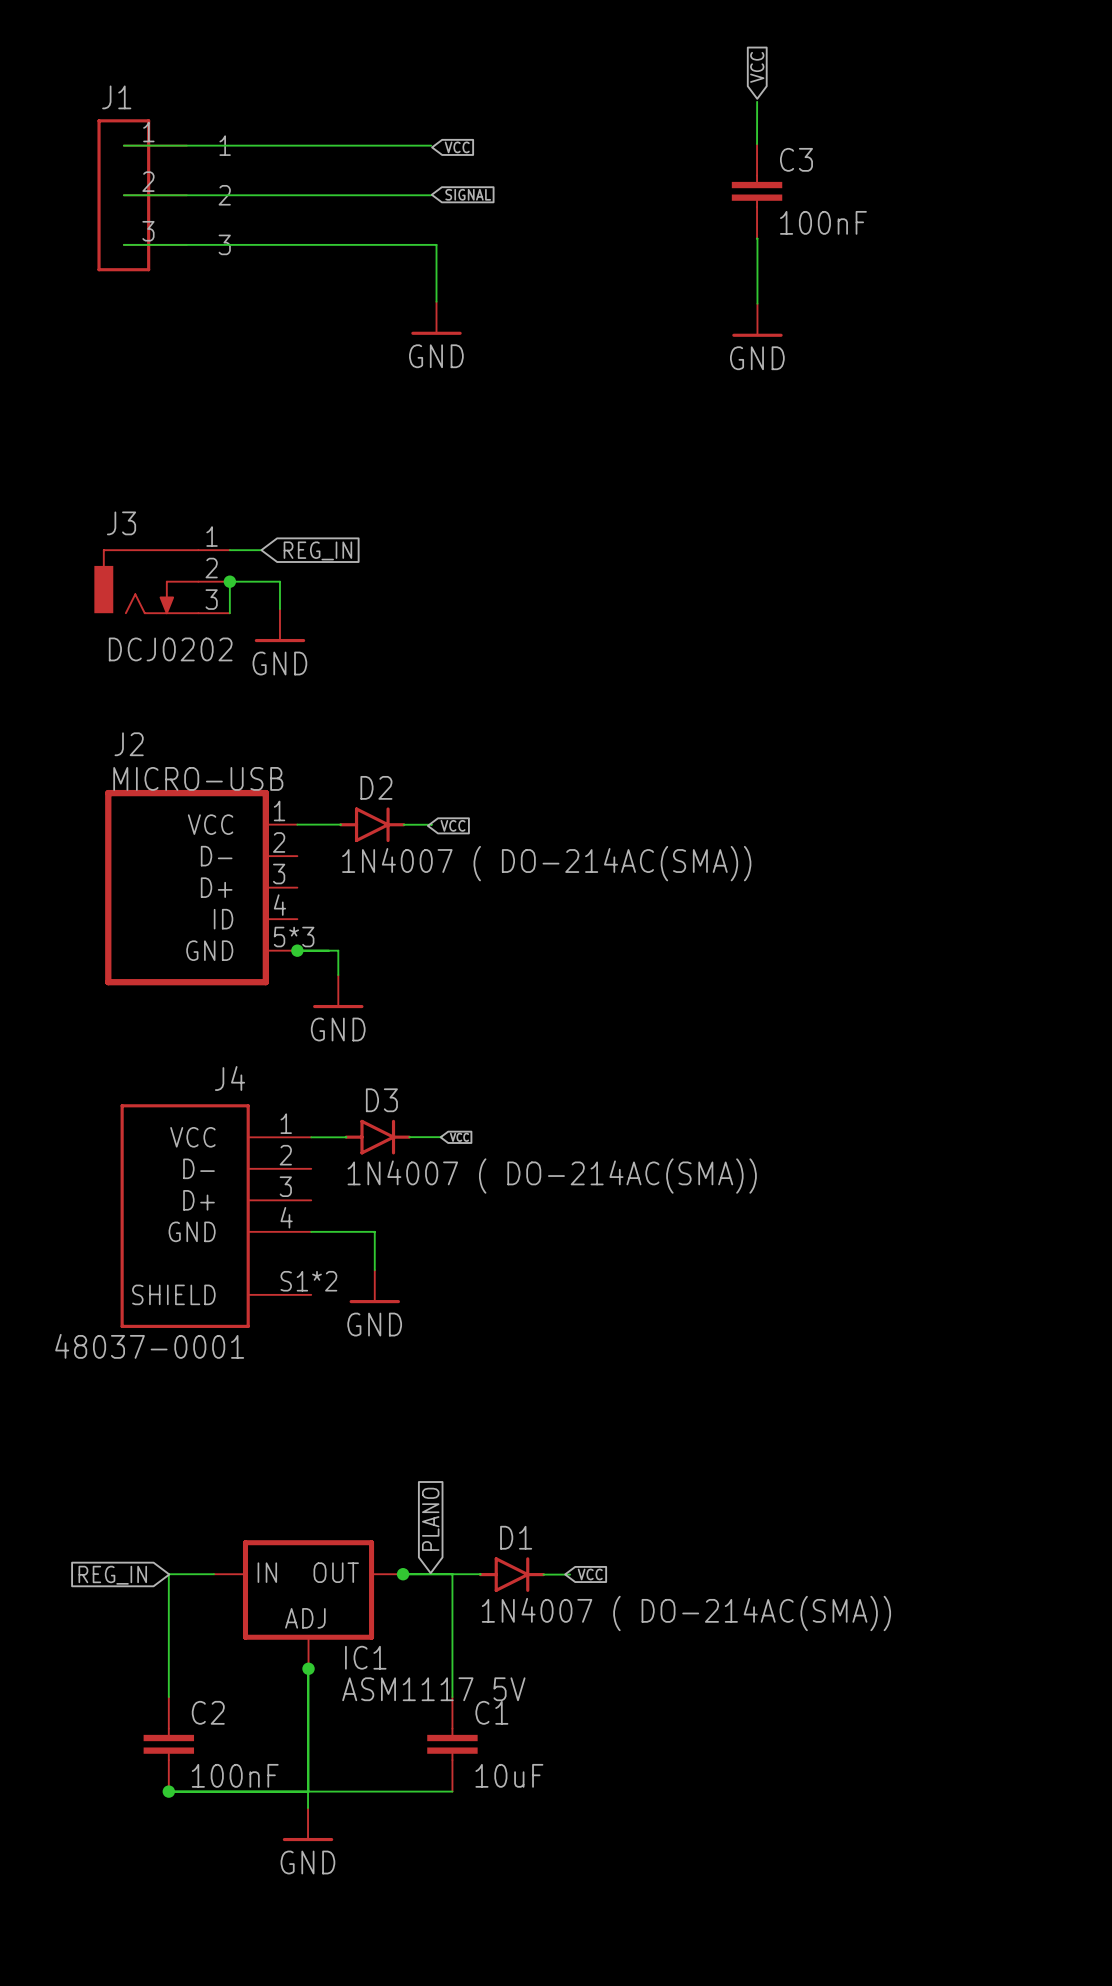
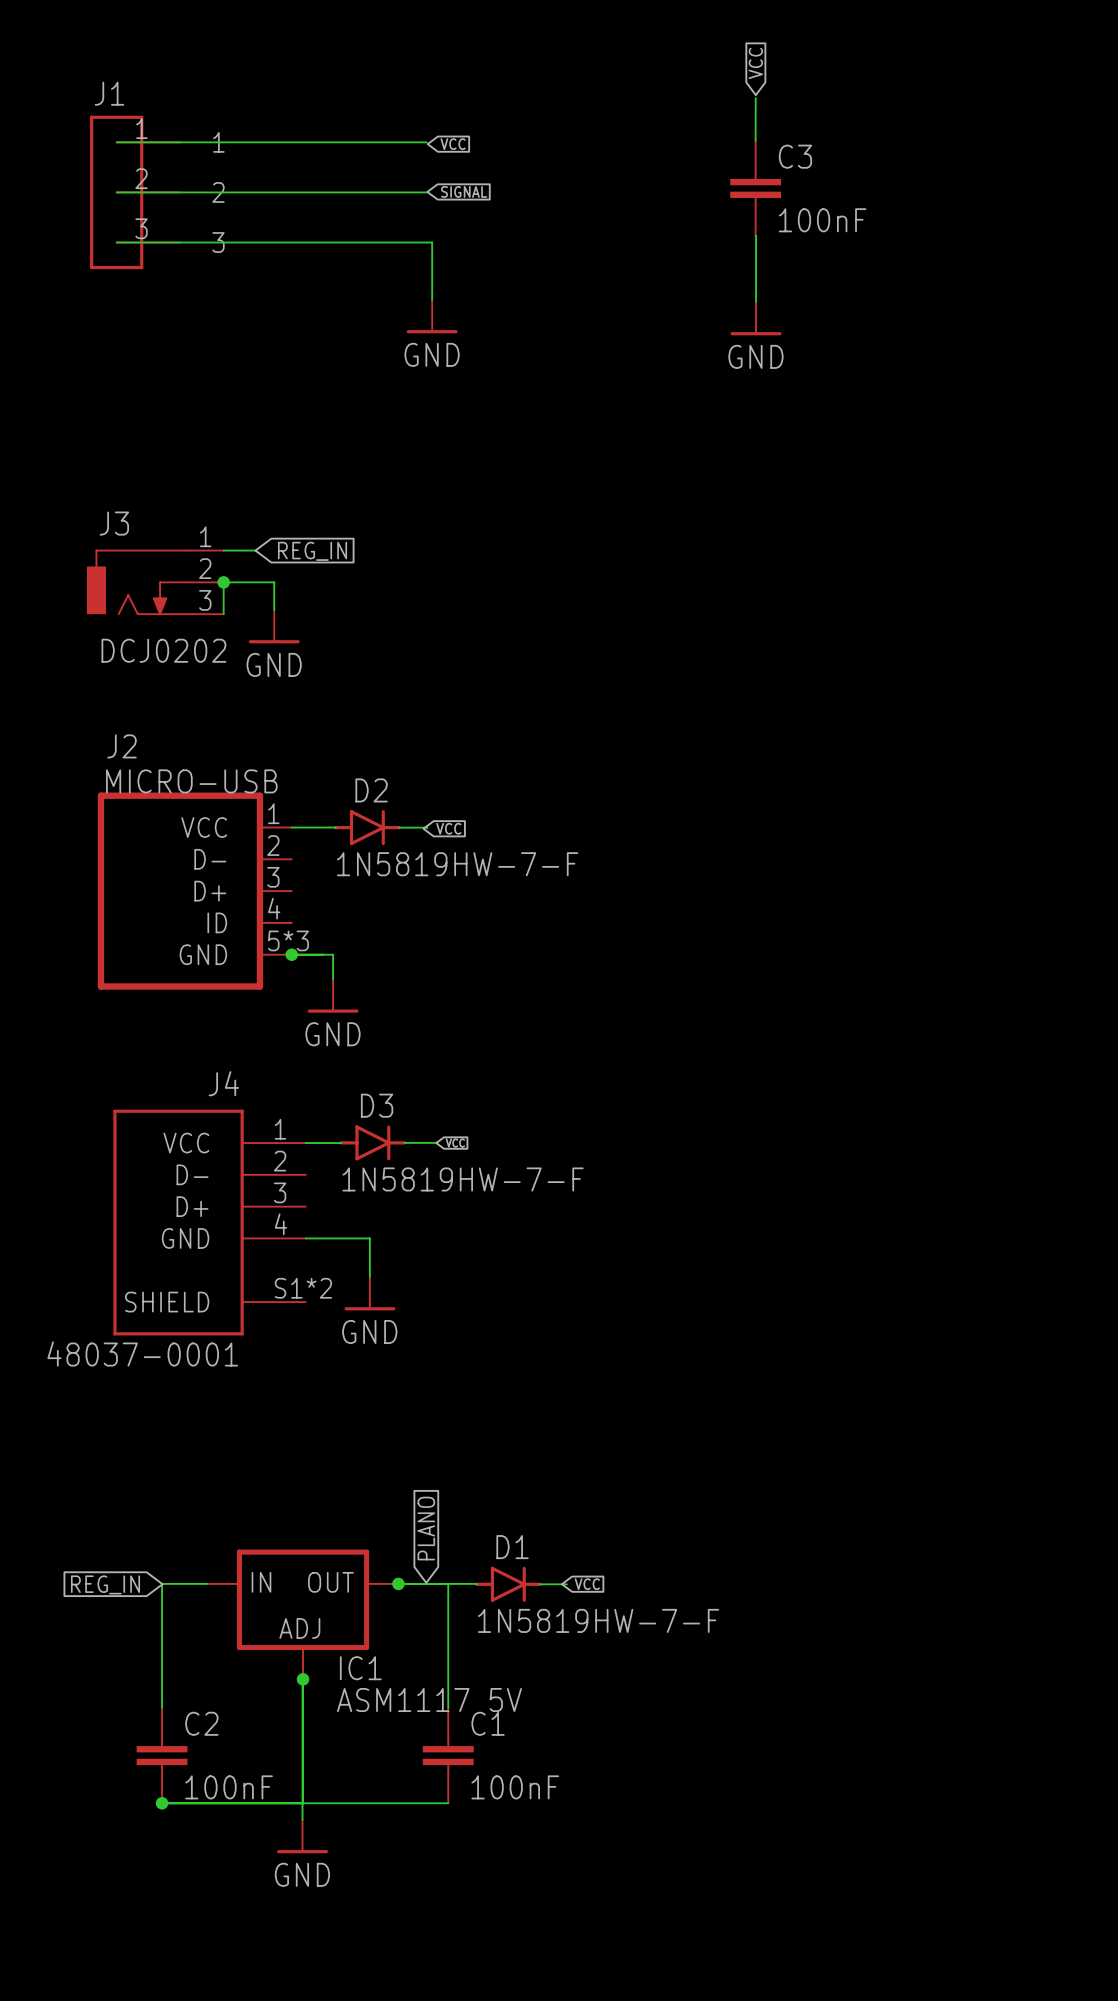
D2 value: 1N4007 ( DO-214AC(SMA)) (546, 863) -> 1N5819HW-7-F (457, 864)
D3 value: 1N4007 ( DO-214AC(SMA)) (552, 1176) -> 1N5819HW-7-F (463, 1179)
D1 value: 1N4007 ( DO-214AC(SMA)) (686, 1613) -> 1N5819HW-7-F (598, 1620)
C1 value: 10uF (509, 1775) -> 100nF (515, 1787)

